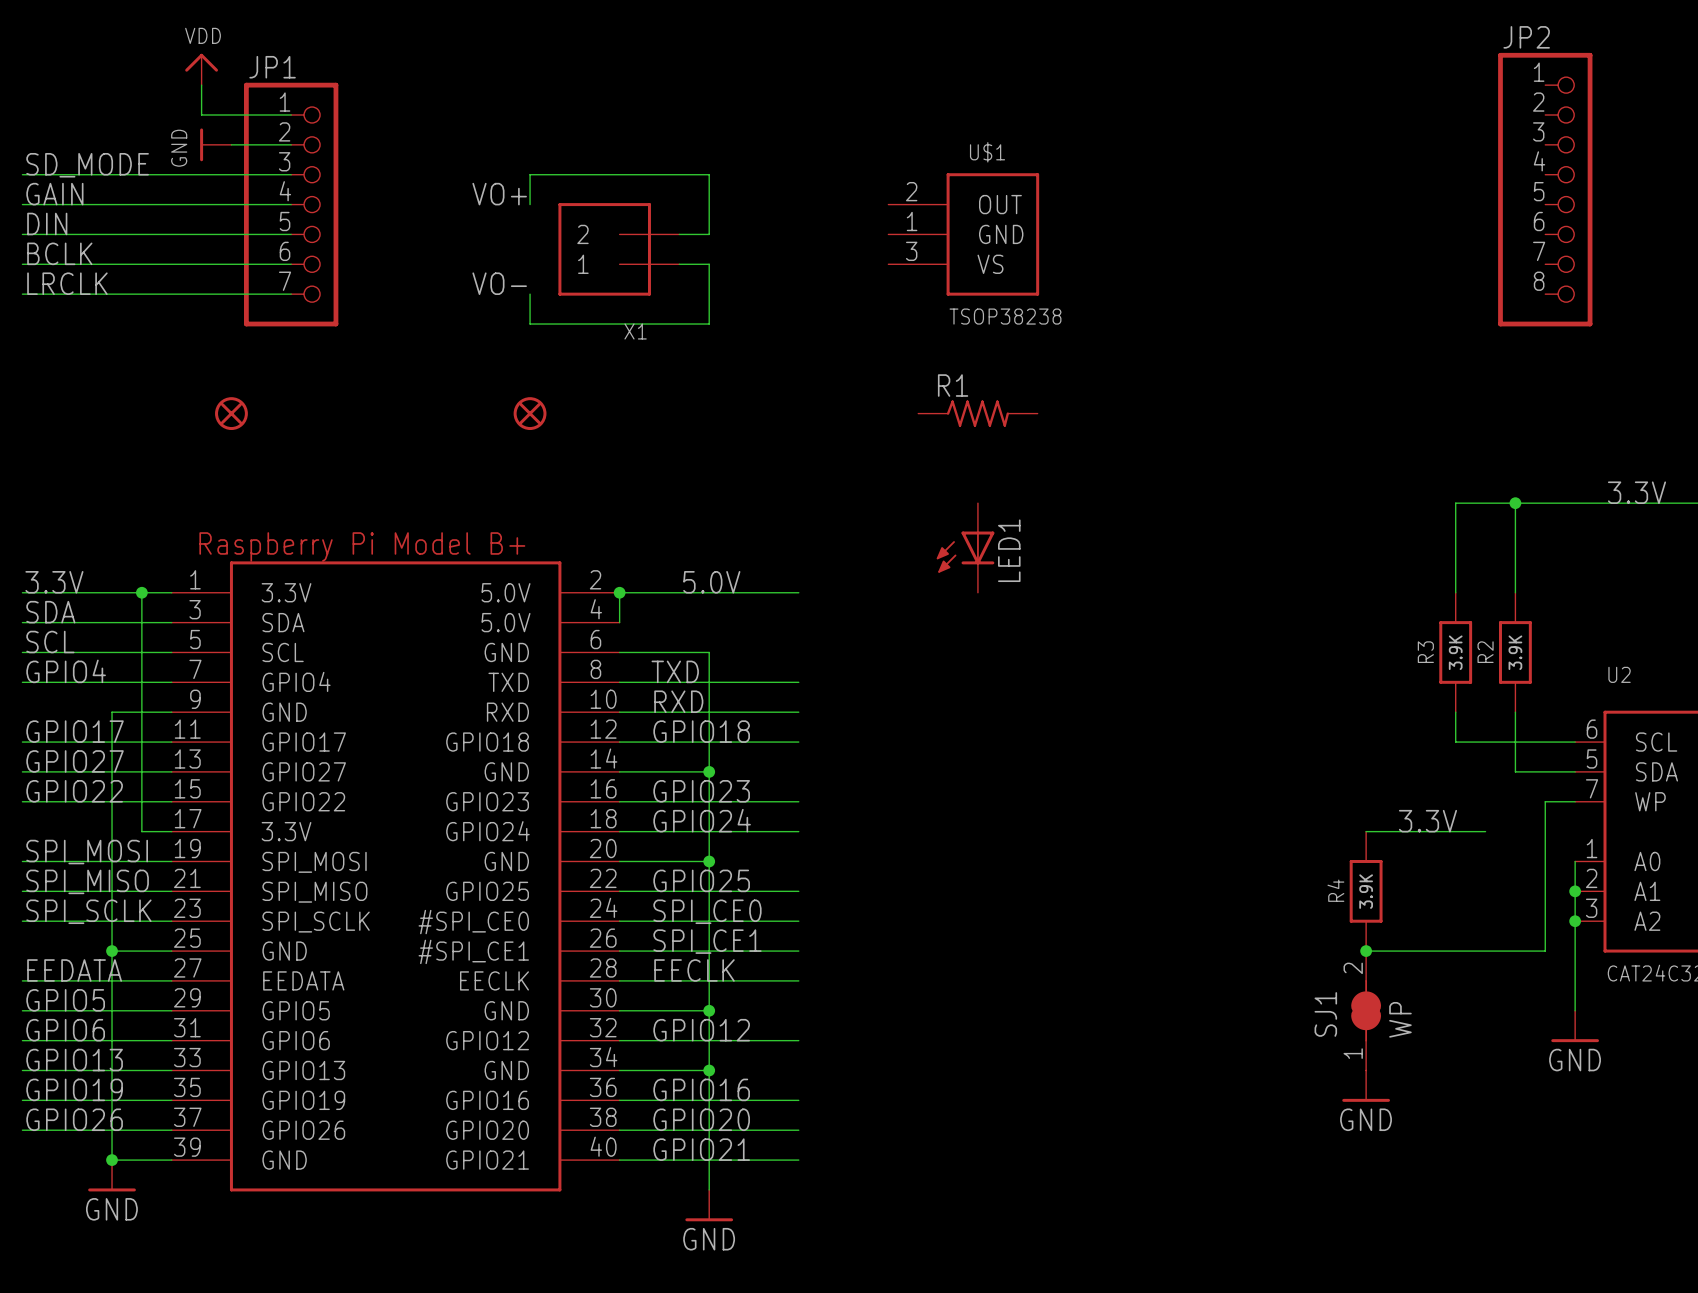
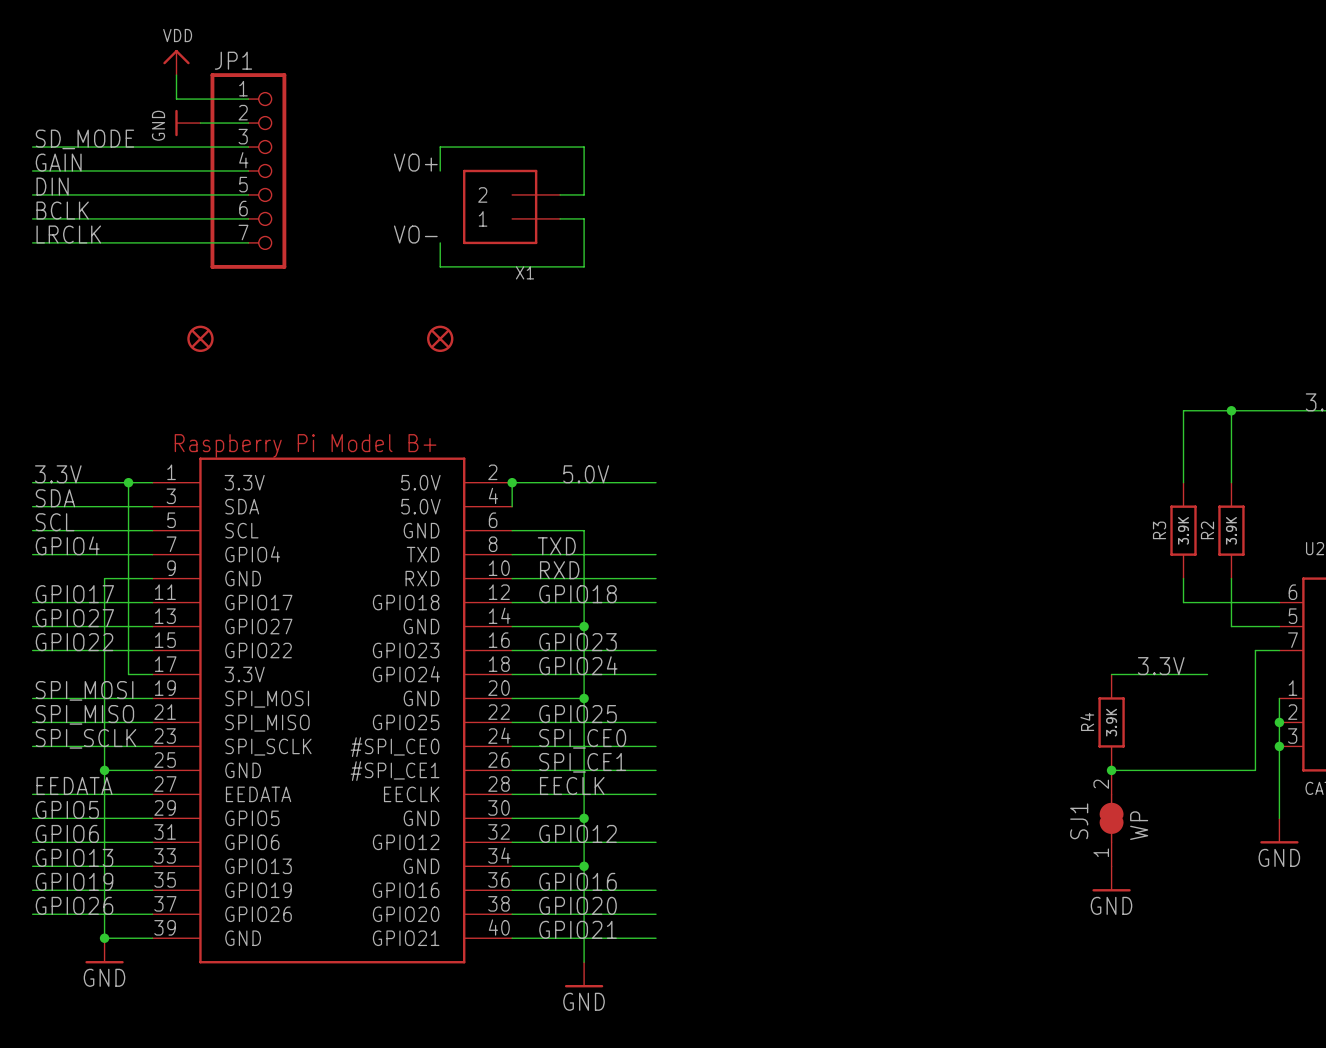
JP2: (1545, 189) -> none
U$1: TSOP38238 (963, 234) -> none
R1: (977, 413) -> none
LED1: (965, 547) -> none

